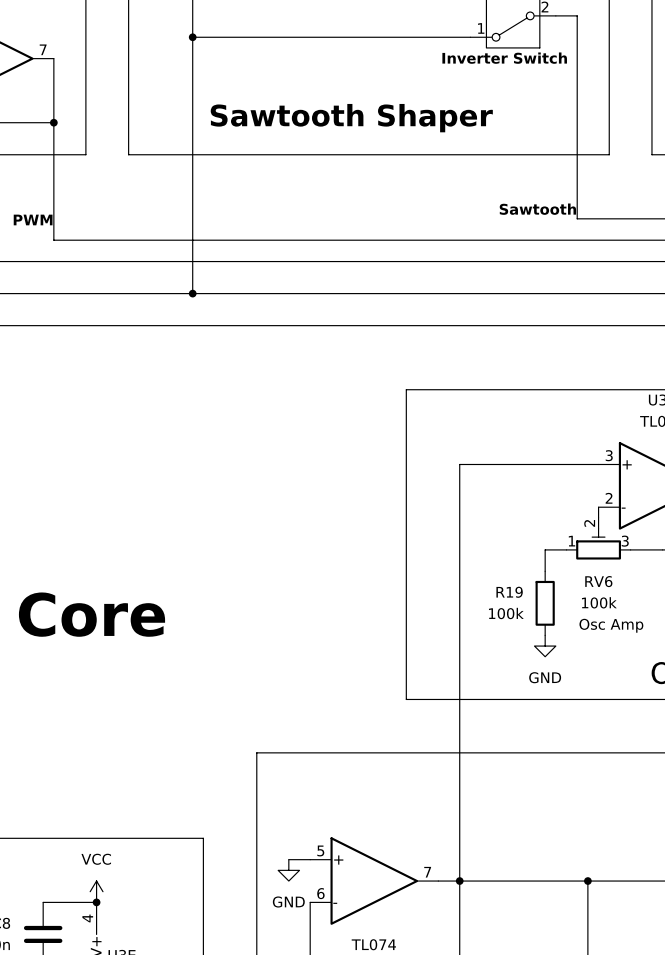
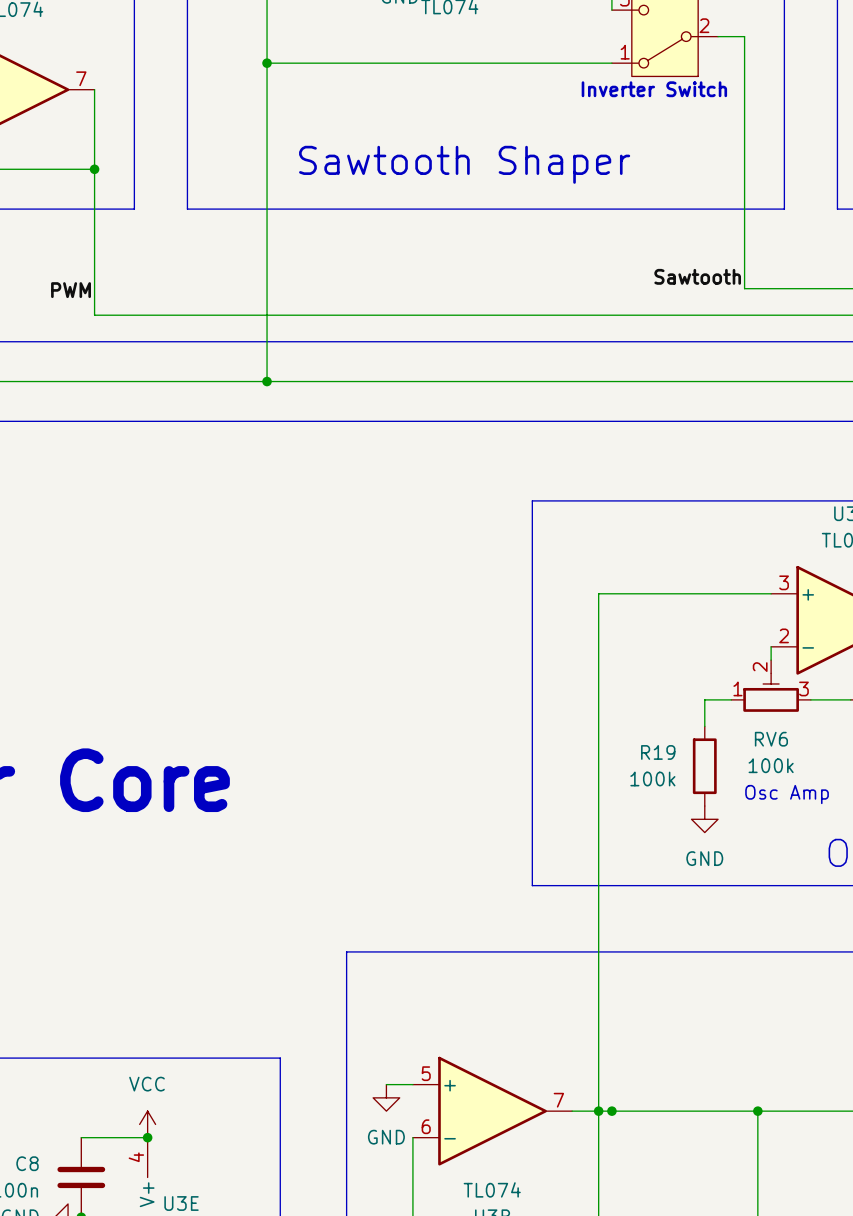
junction: none -> (611, 1111)

